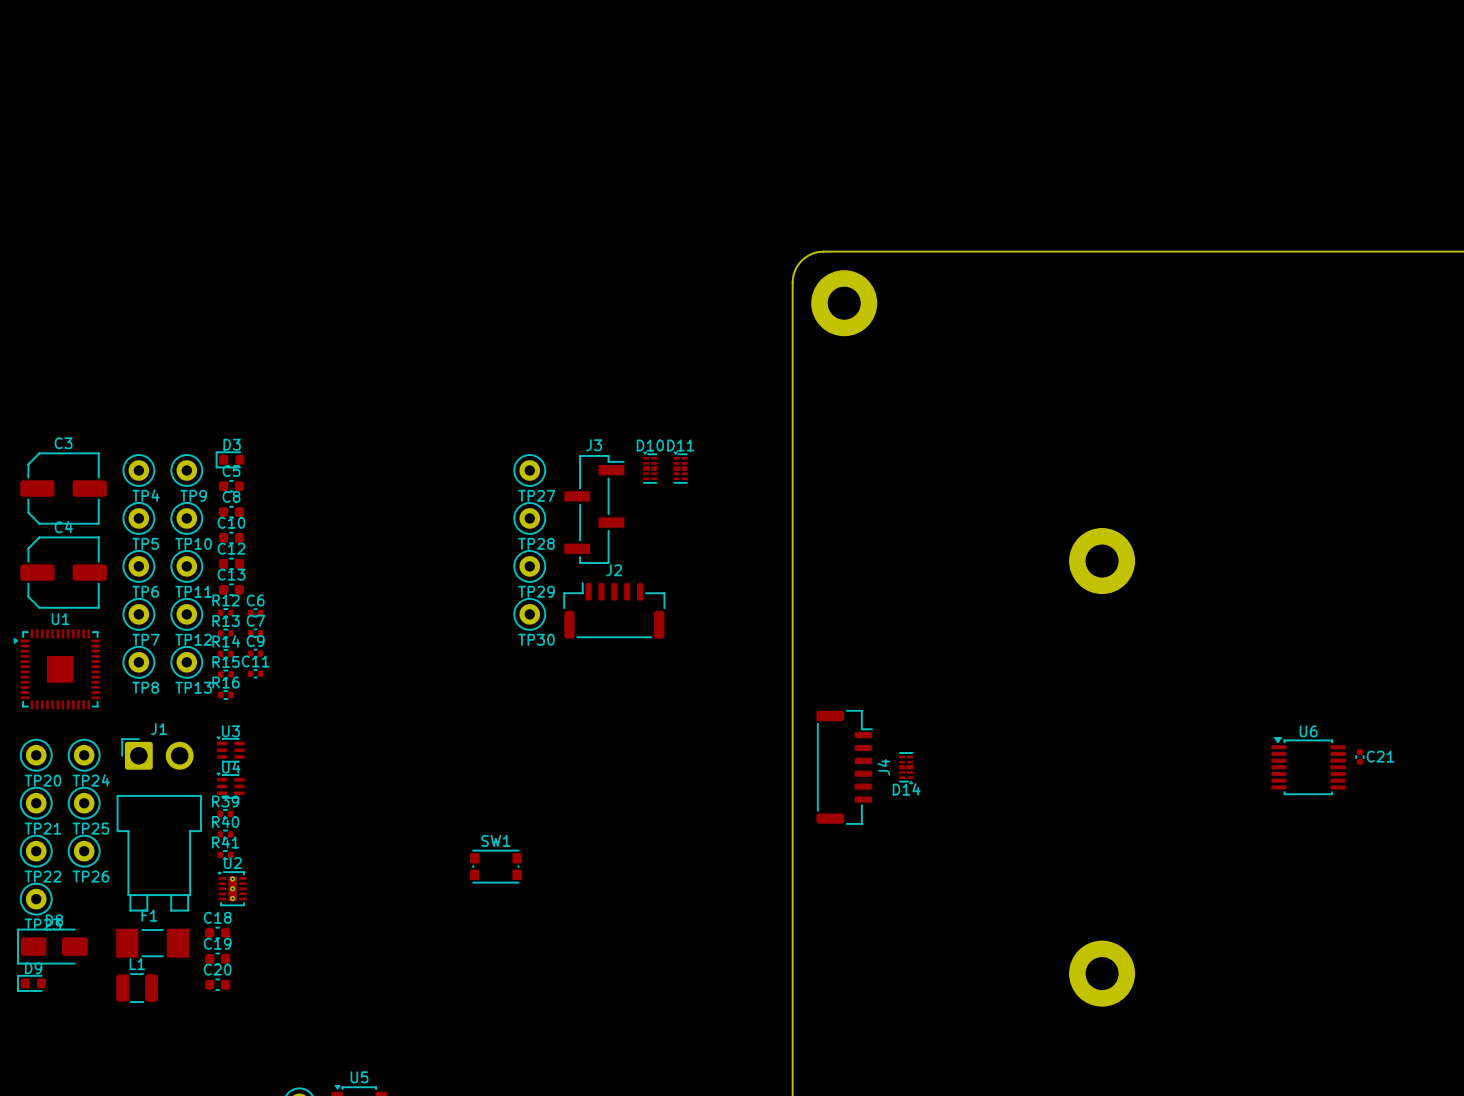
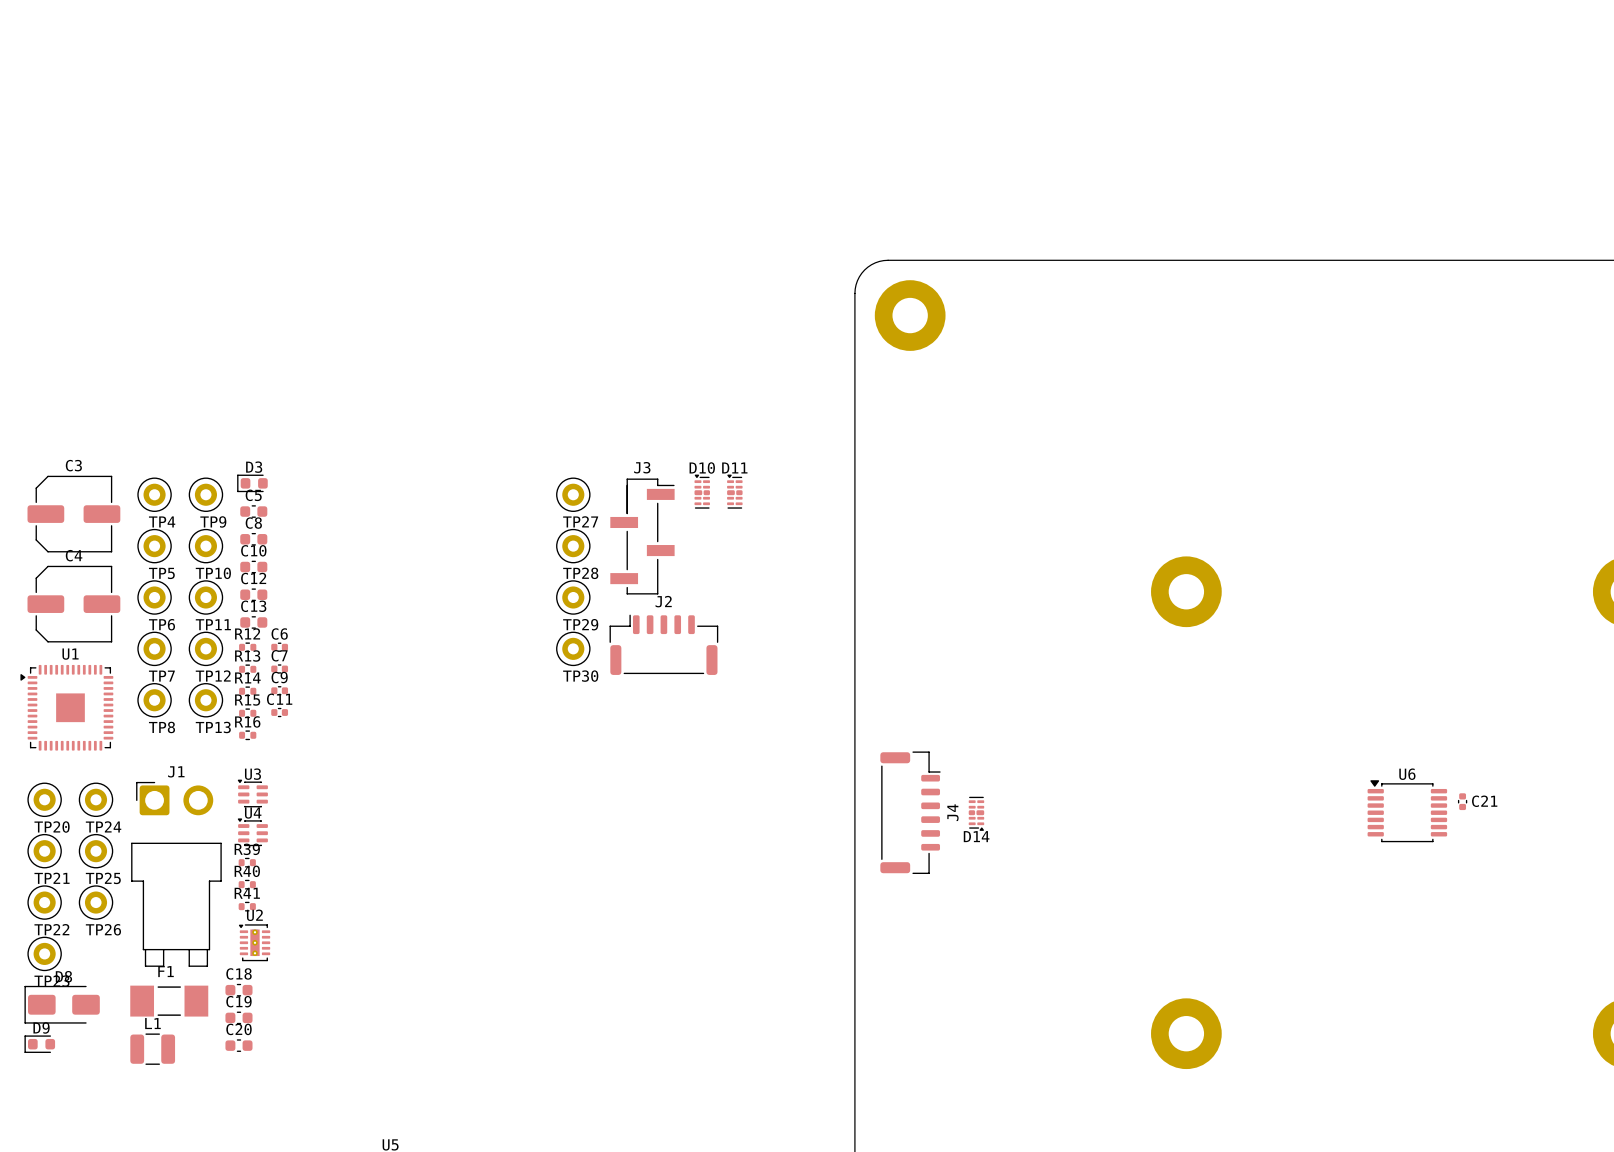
SW1: (495, 866) -> none

